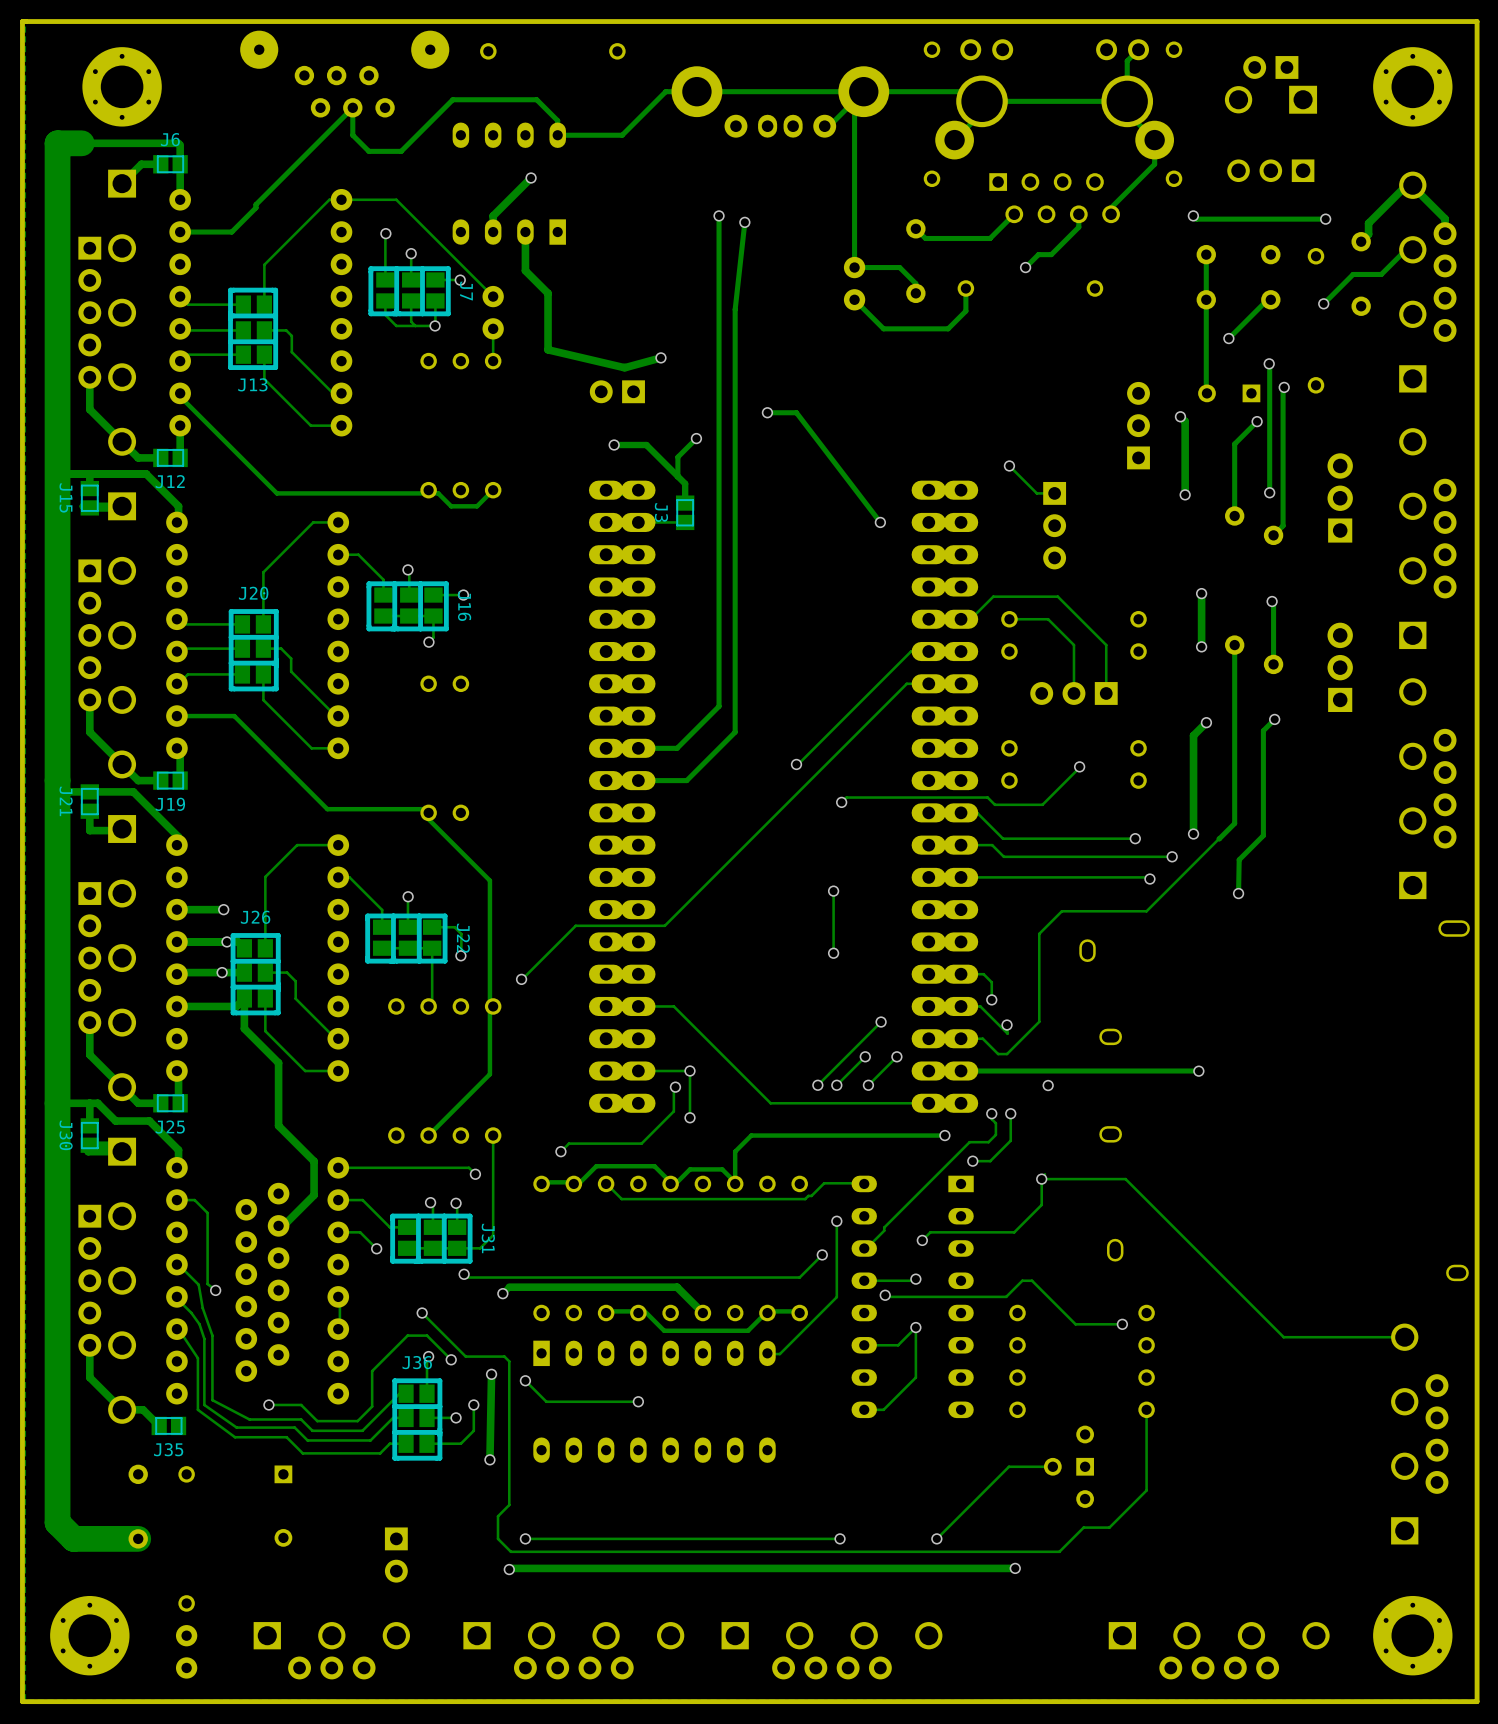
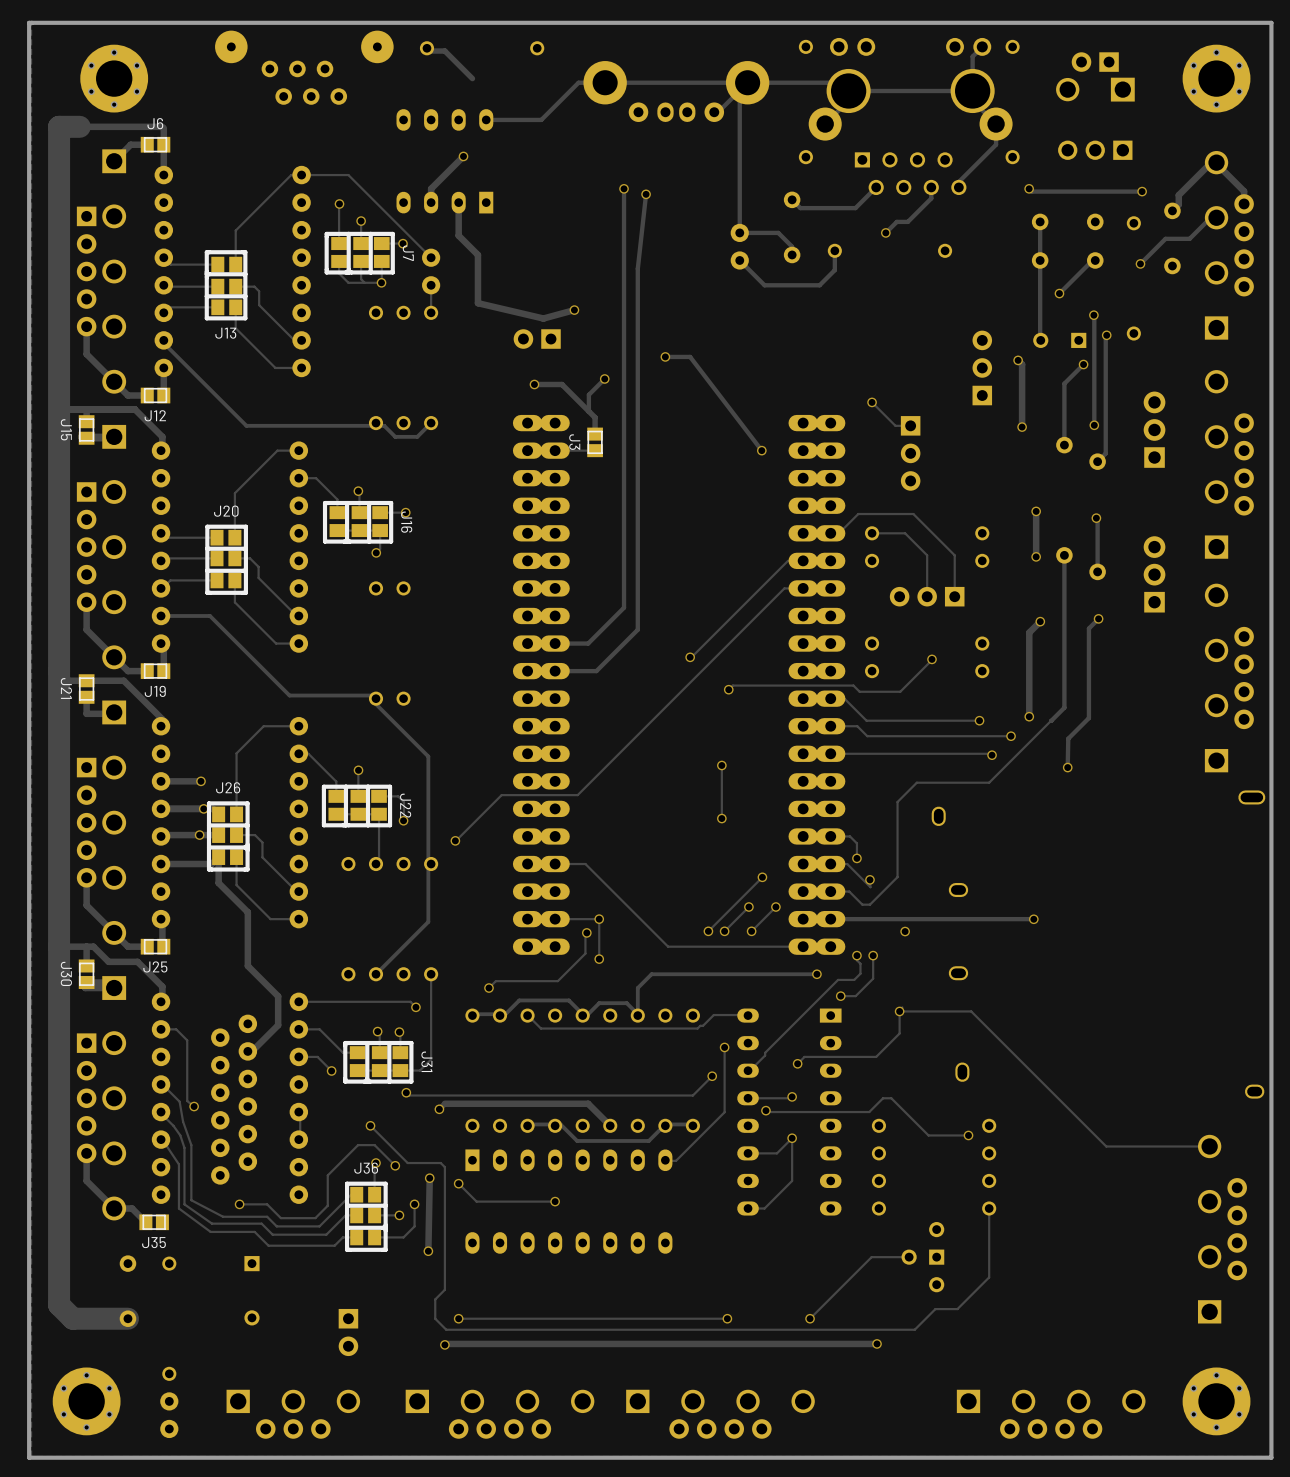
track: none -> (431, 51) (444, 51) (472, 78)
track: (557, 135) (557, 120) (536, 99) (452, 99) (401, 151) (368, 151) (352, 135) (352, 107) (255, 204) (255, 207) (231, 232) (180, 232) -> none

